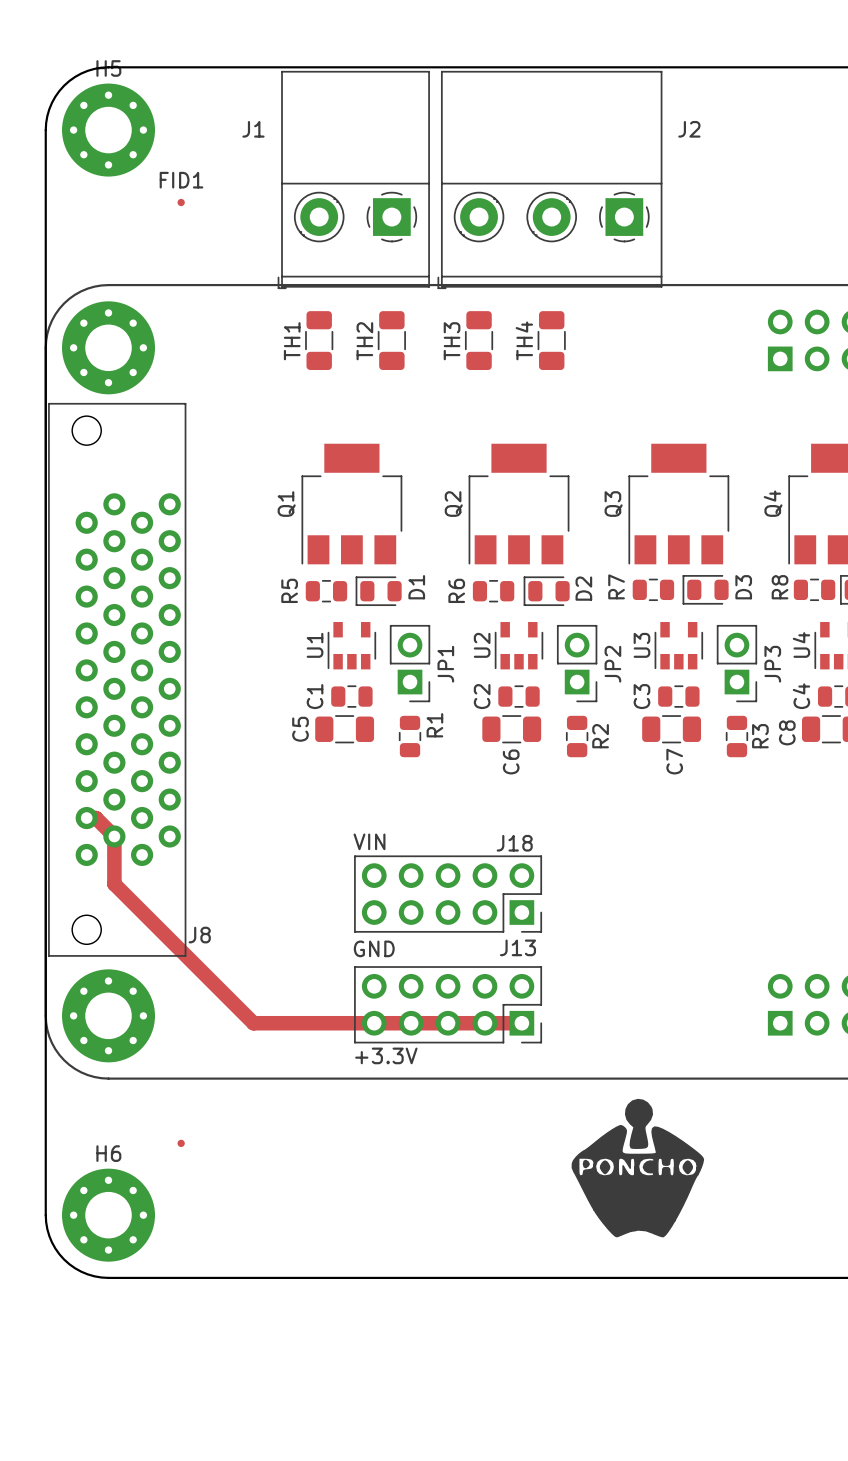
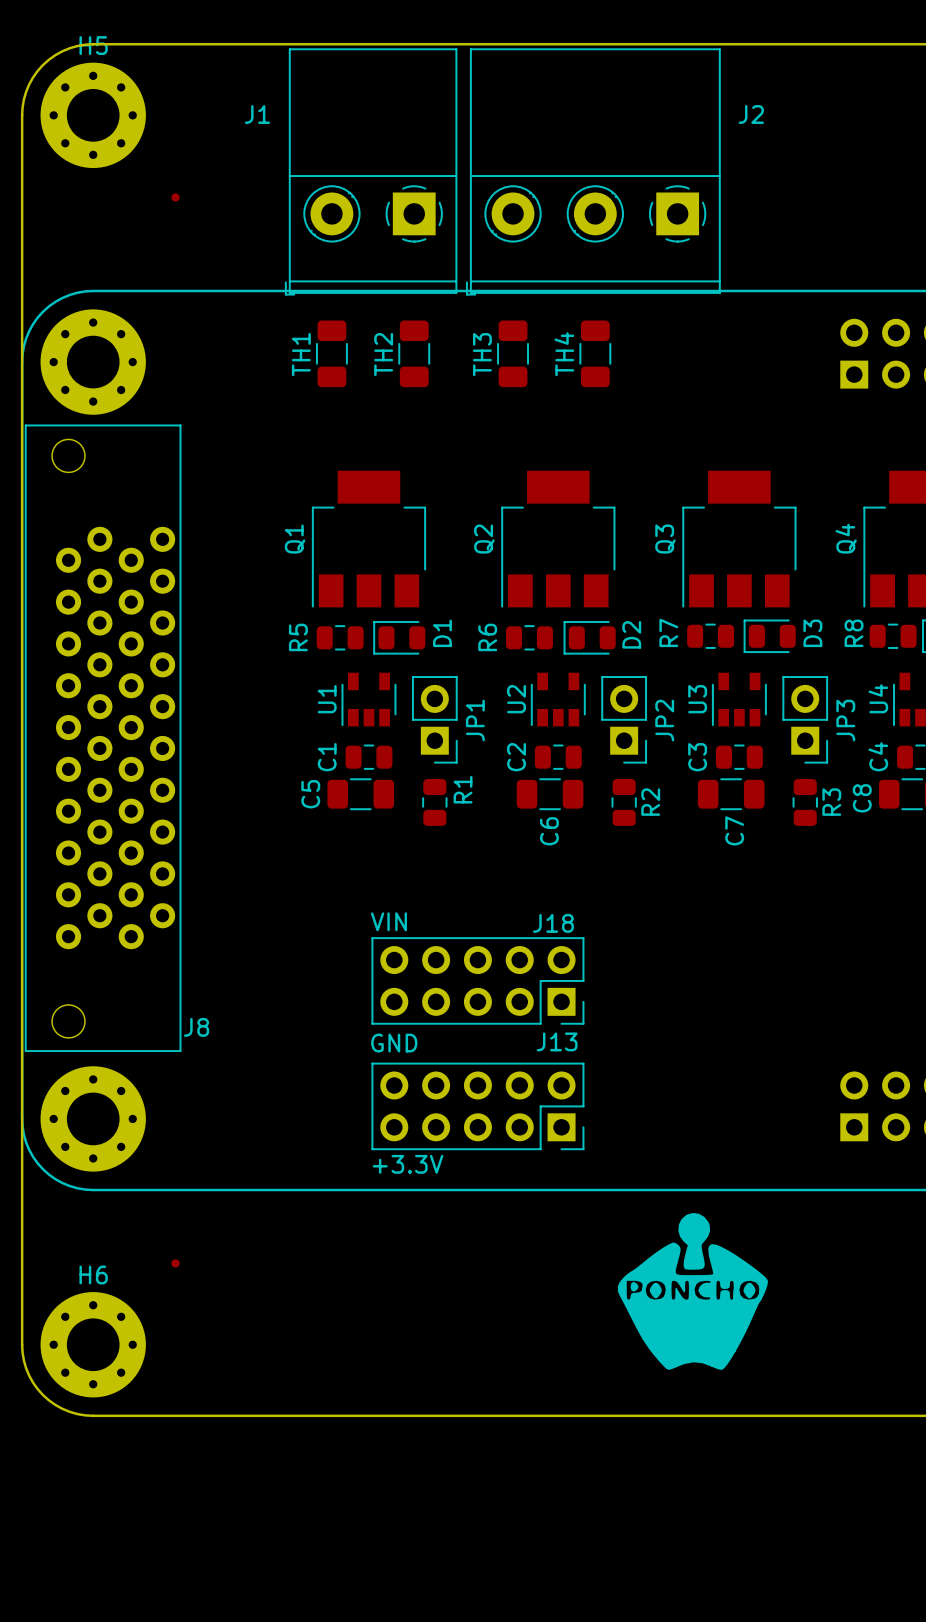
FID1 name: FID1 (181, 180) -> none
track: (86, 818) (95, 818) (114, 836) (114, 884) (253, 1023) (521, 1023) -> none

